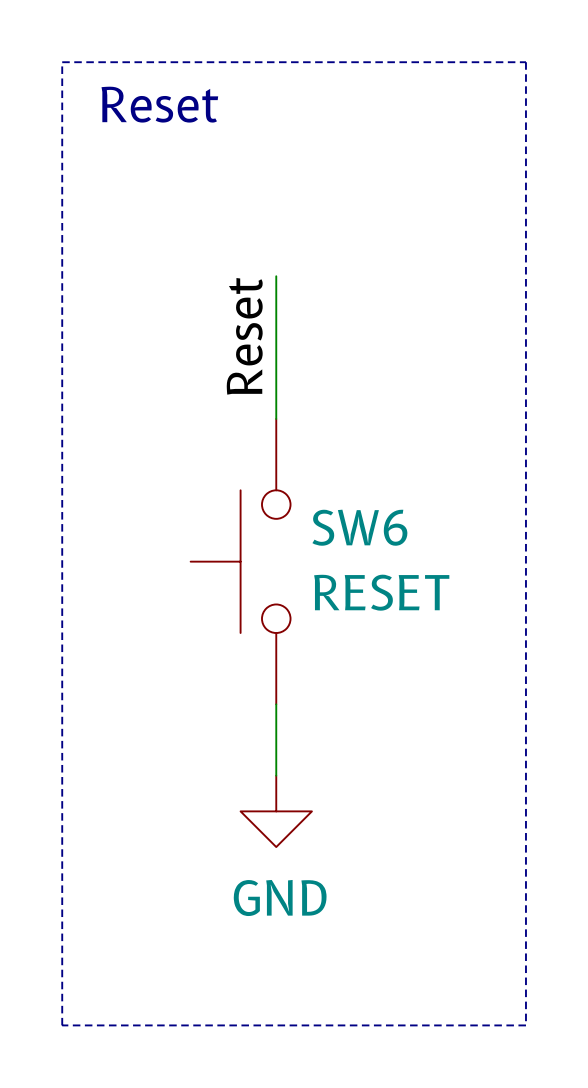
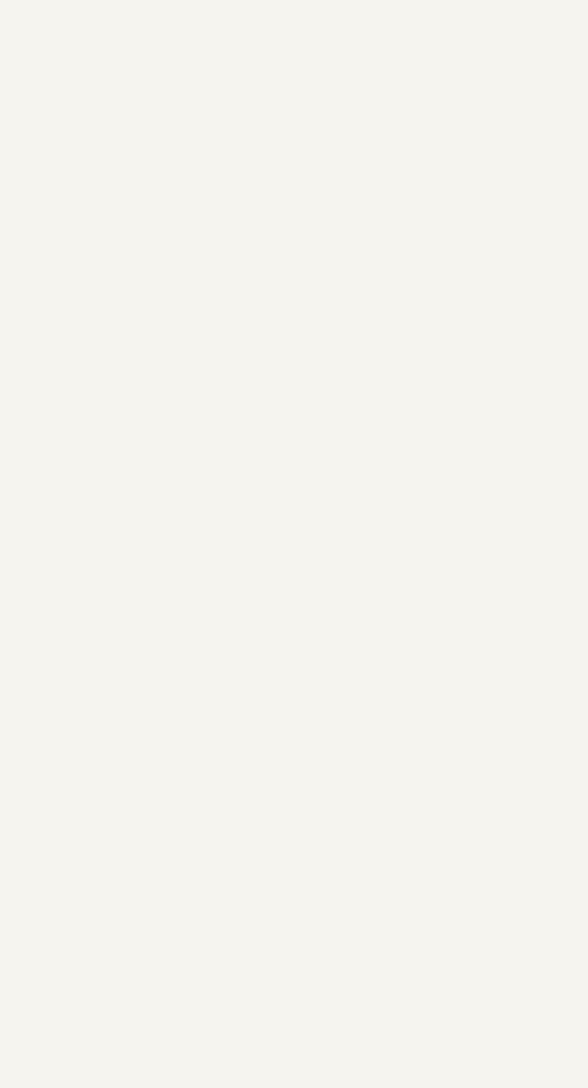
line: (62, 62) (525, 62) (525, 1025) (62, 1025) (62, 62) -> none
text: Reset (159, 104) -> none
wire: (276, 276) (276, 418) -> none
label: Reset (244, 336) -> none
SW6: RESET (240, 561) -> none
wire: (276, 704) (276, 775) -> none
power symbol: GND (276, 811) -> none

